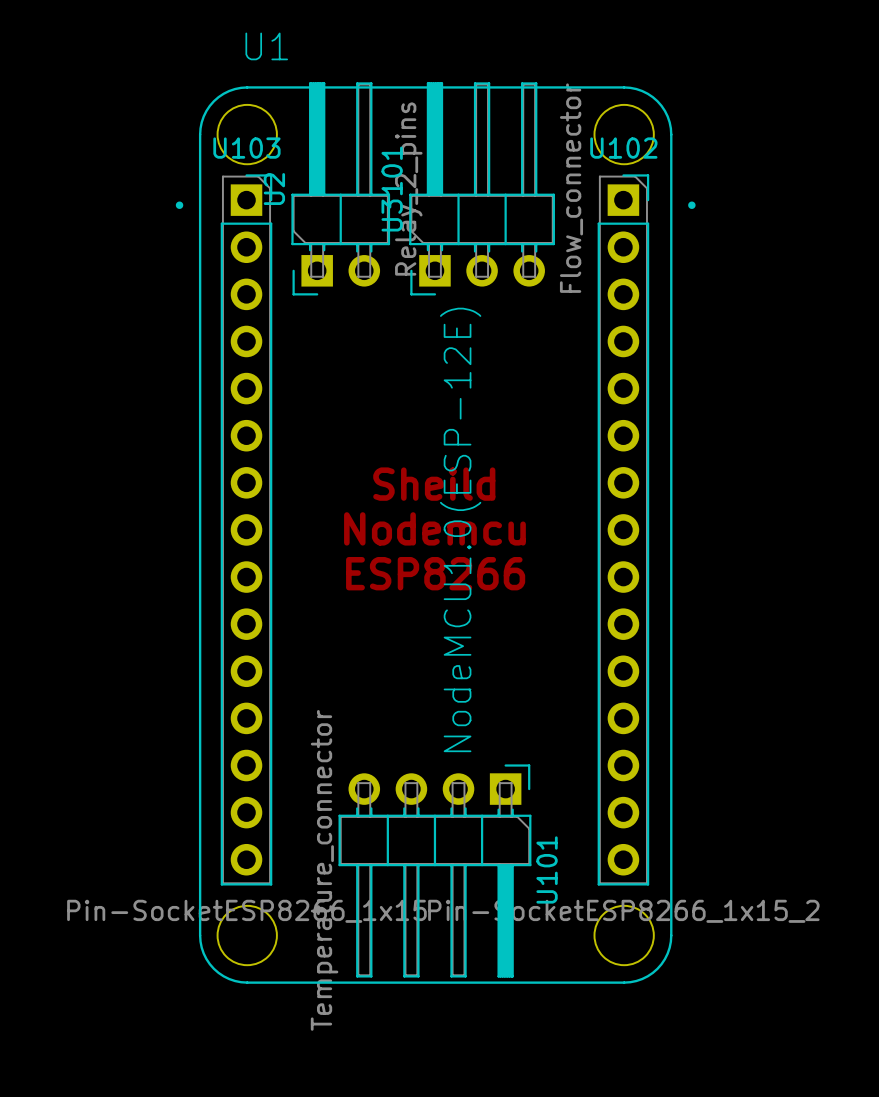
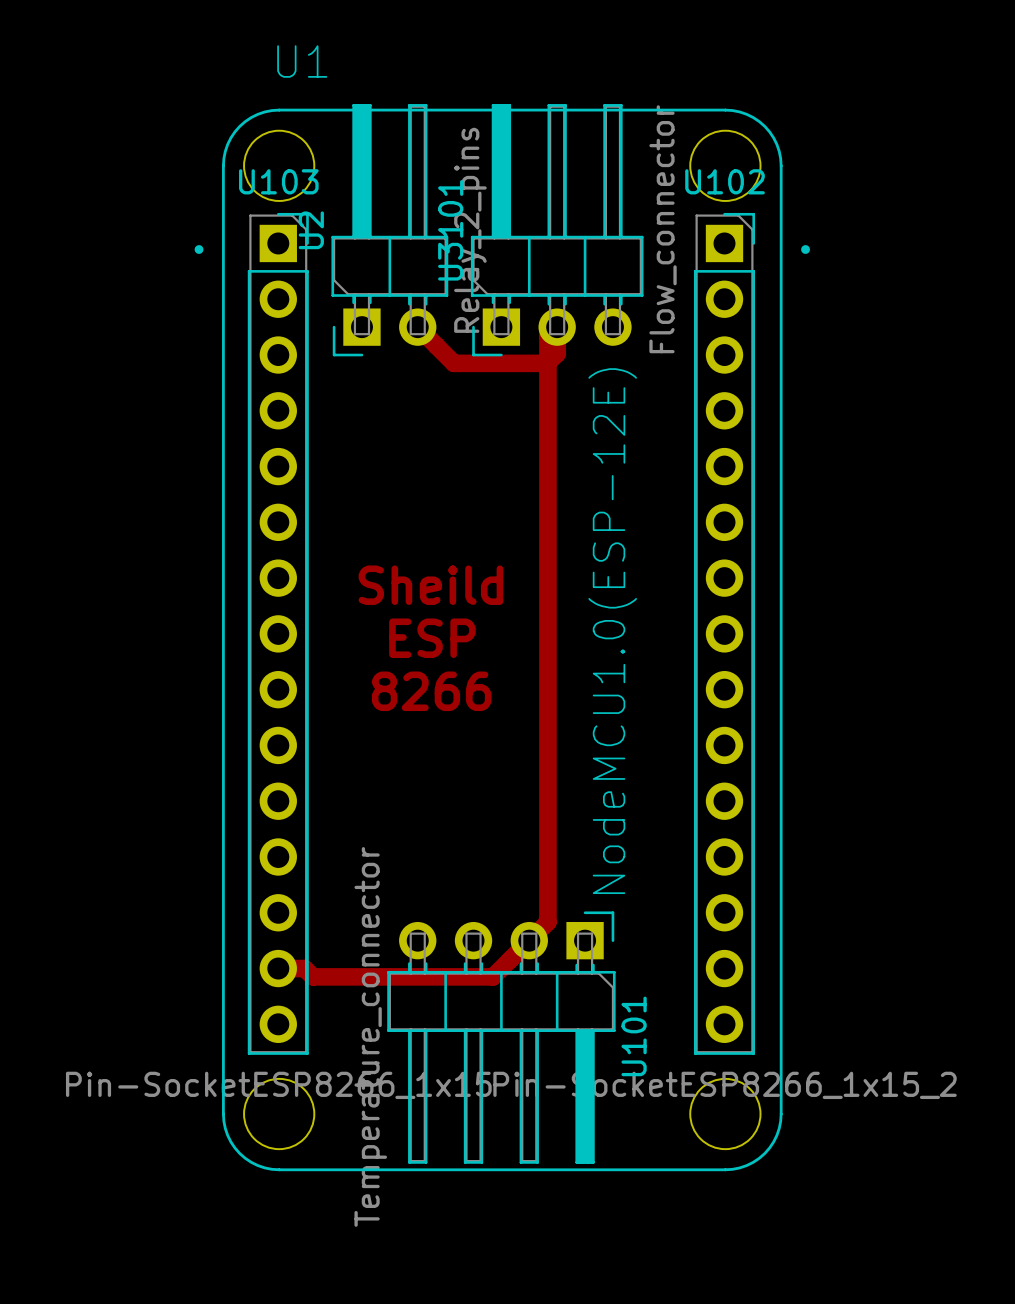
track: none -> (417, 327) (453, 363) (547, 363) (557, 353) (557, 327) (547, 336) (547, 921) (493, 976) (313, 976) (304, 968) (278, 968)
text position: Sheild (434, 484) -> Sheild (430, 585)
text: Nodemcu (434, 528) -> none
U1 value position: NodeMCU1.0(ESP-12E) (460, 529) -> NodeMCU1.0(ESP-12E) (612, 631)
text: none -> ESP (432, 638)
text: ESP8266 (435, 573) -> 8266 (431, 691)

